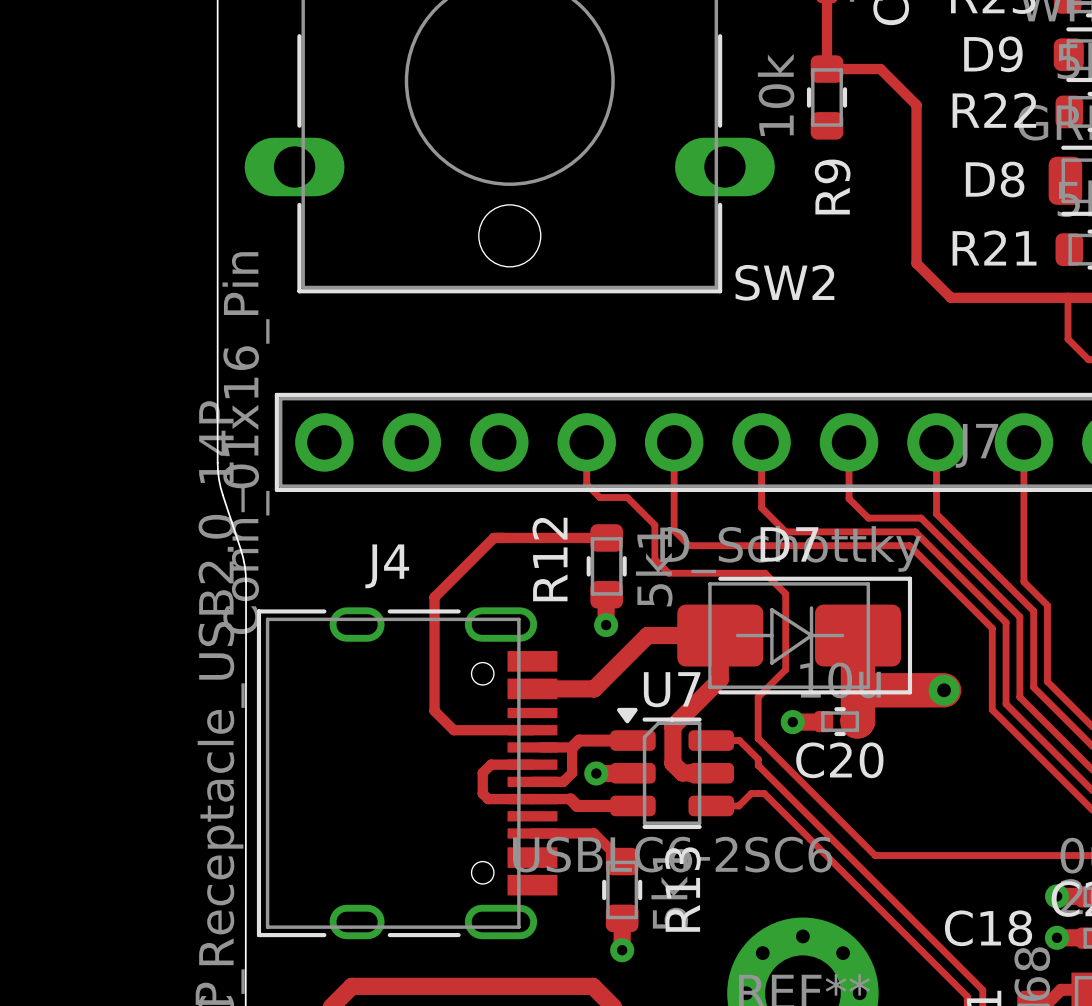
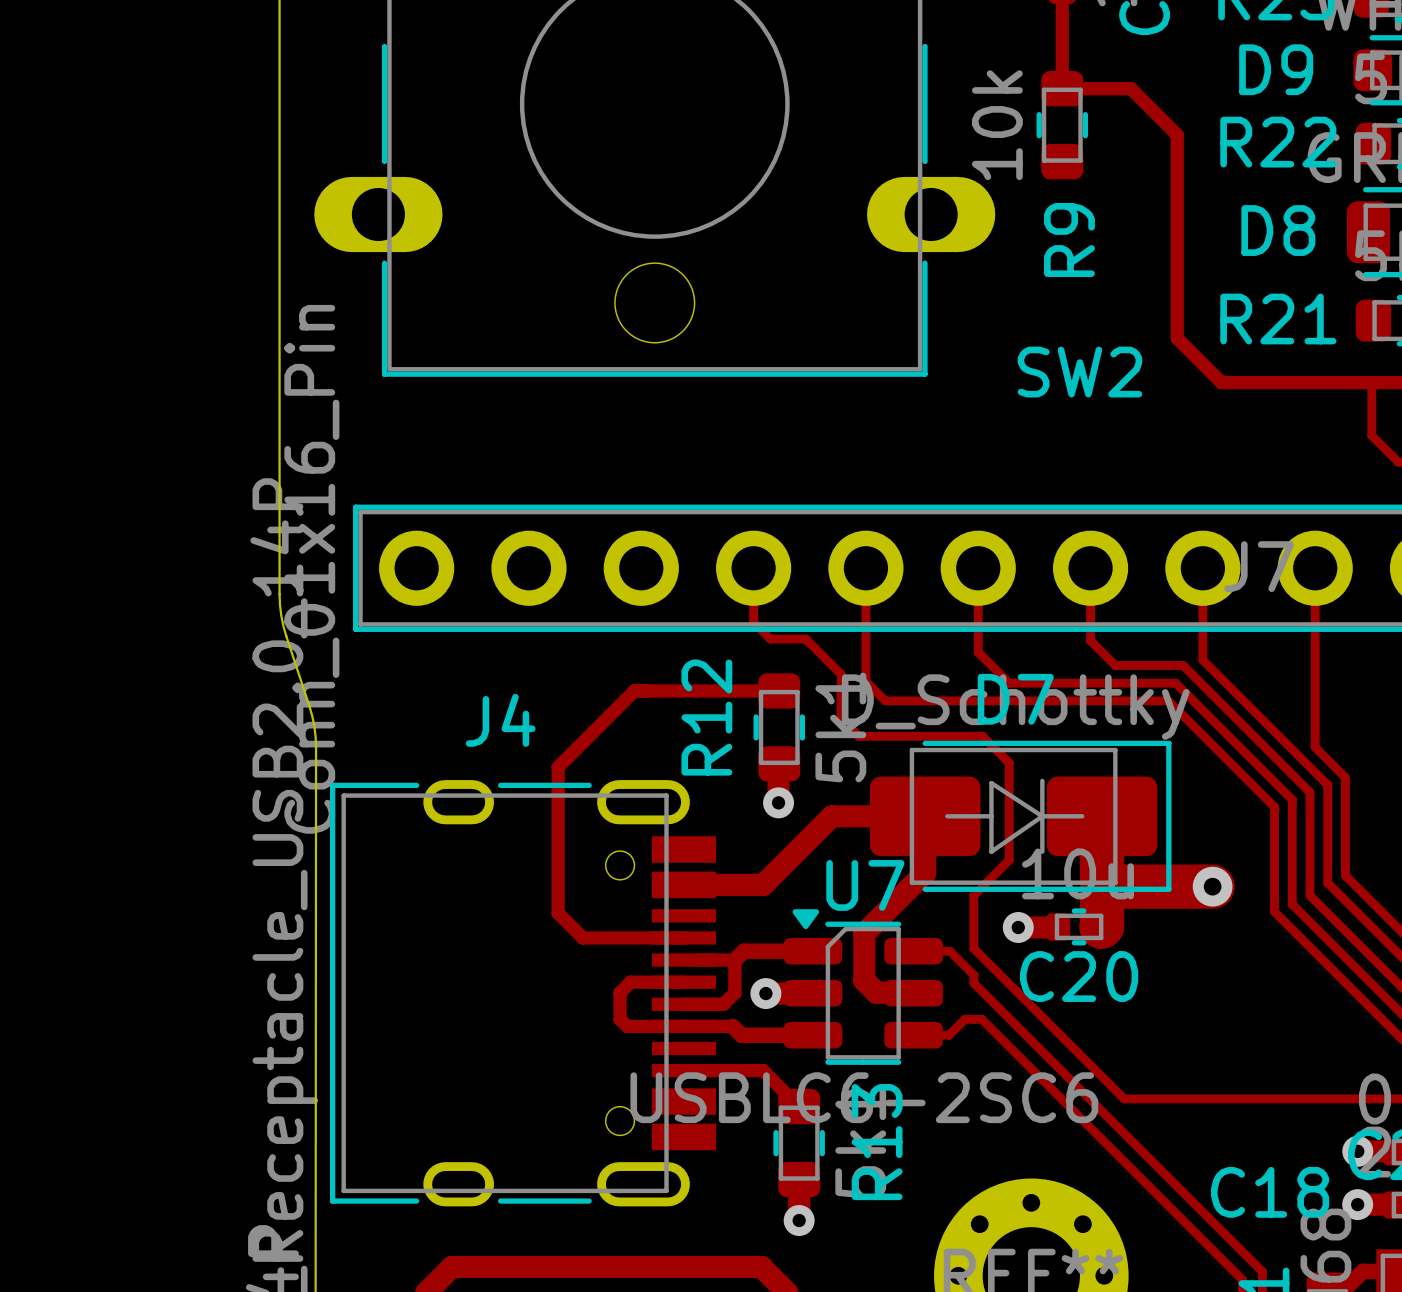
SW2 name position: SW2 (784, 282) -> SW2 (1079, 372)

